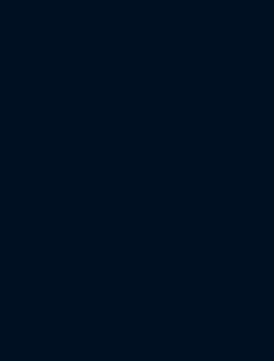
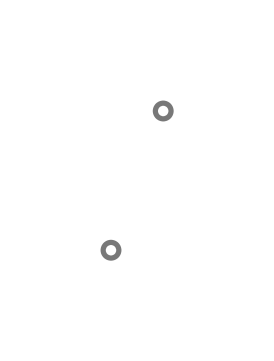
via: none -> (163, 111)
via: none -> (111, 250)

